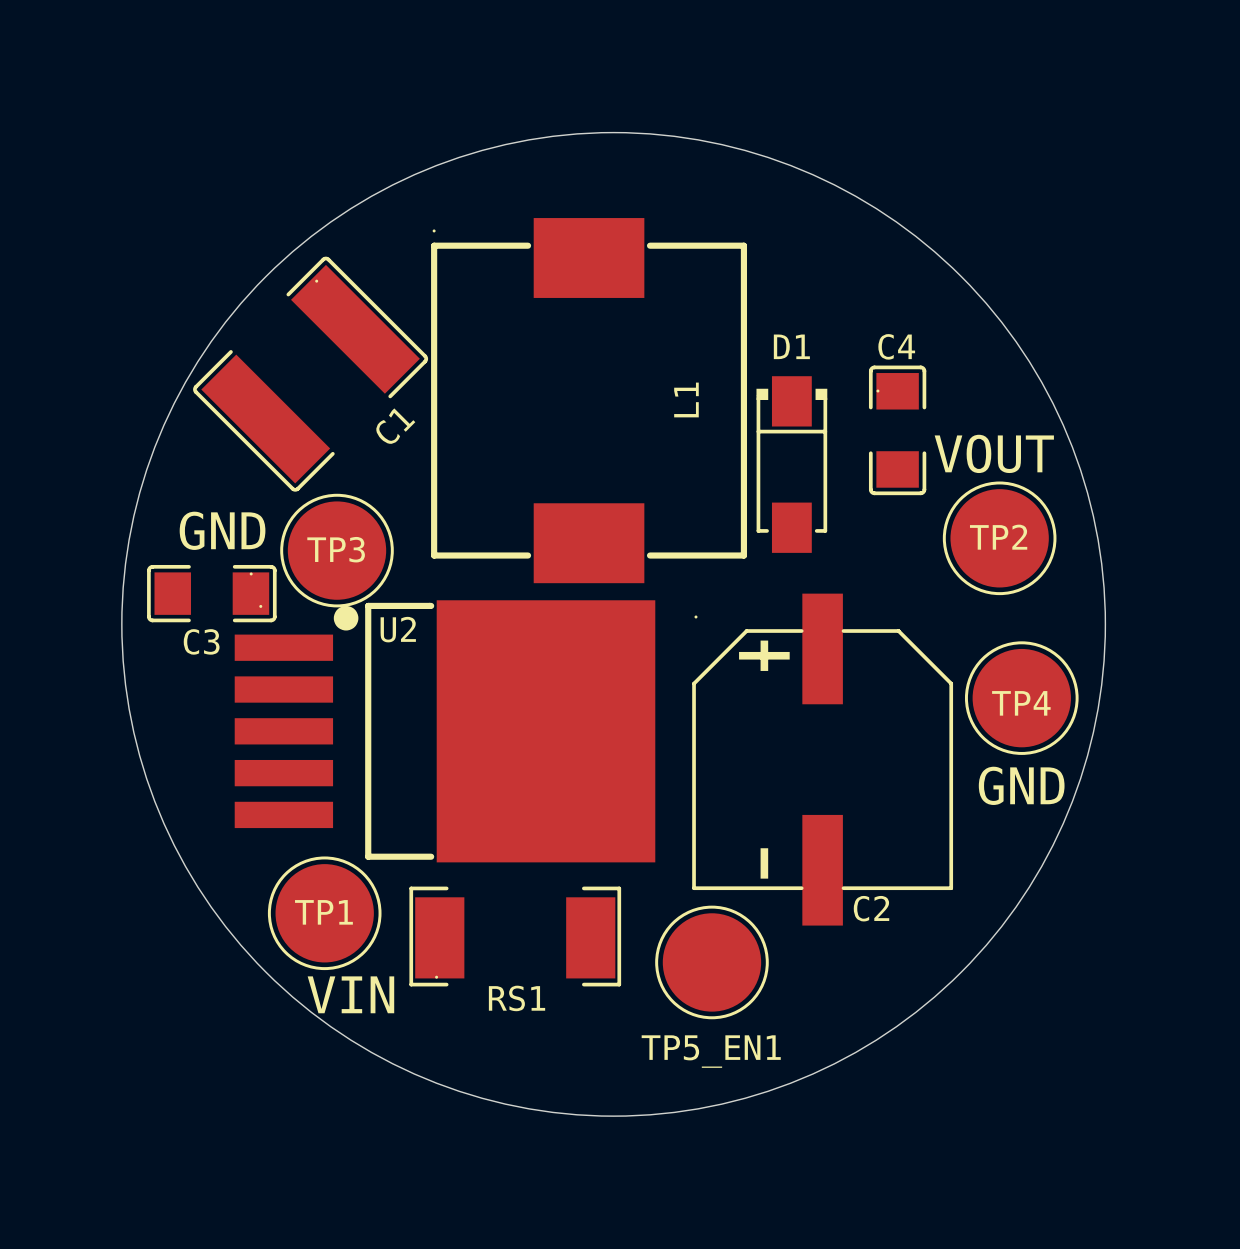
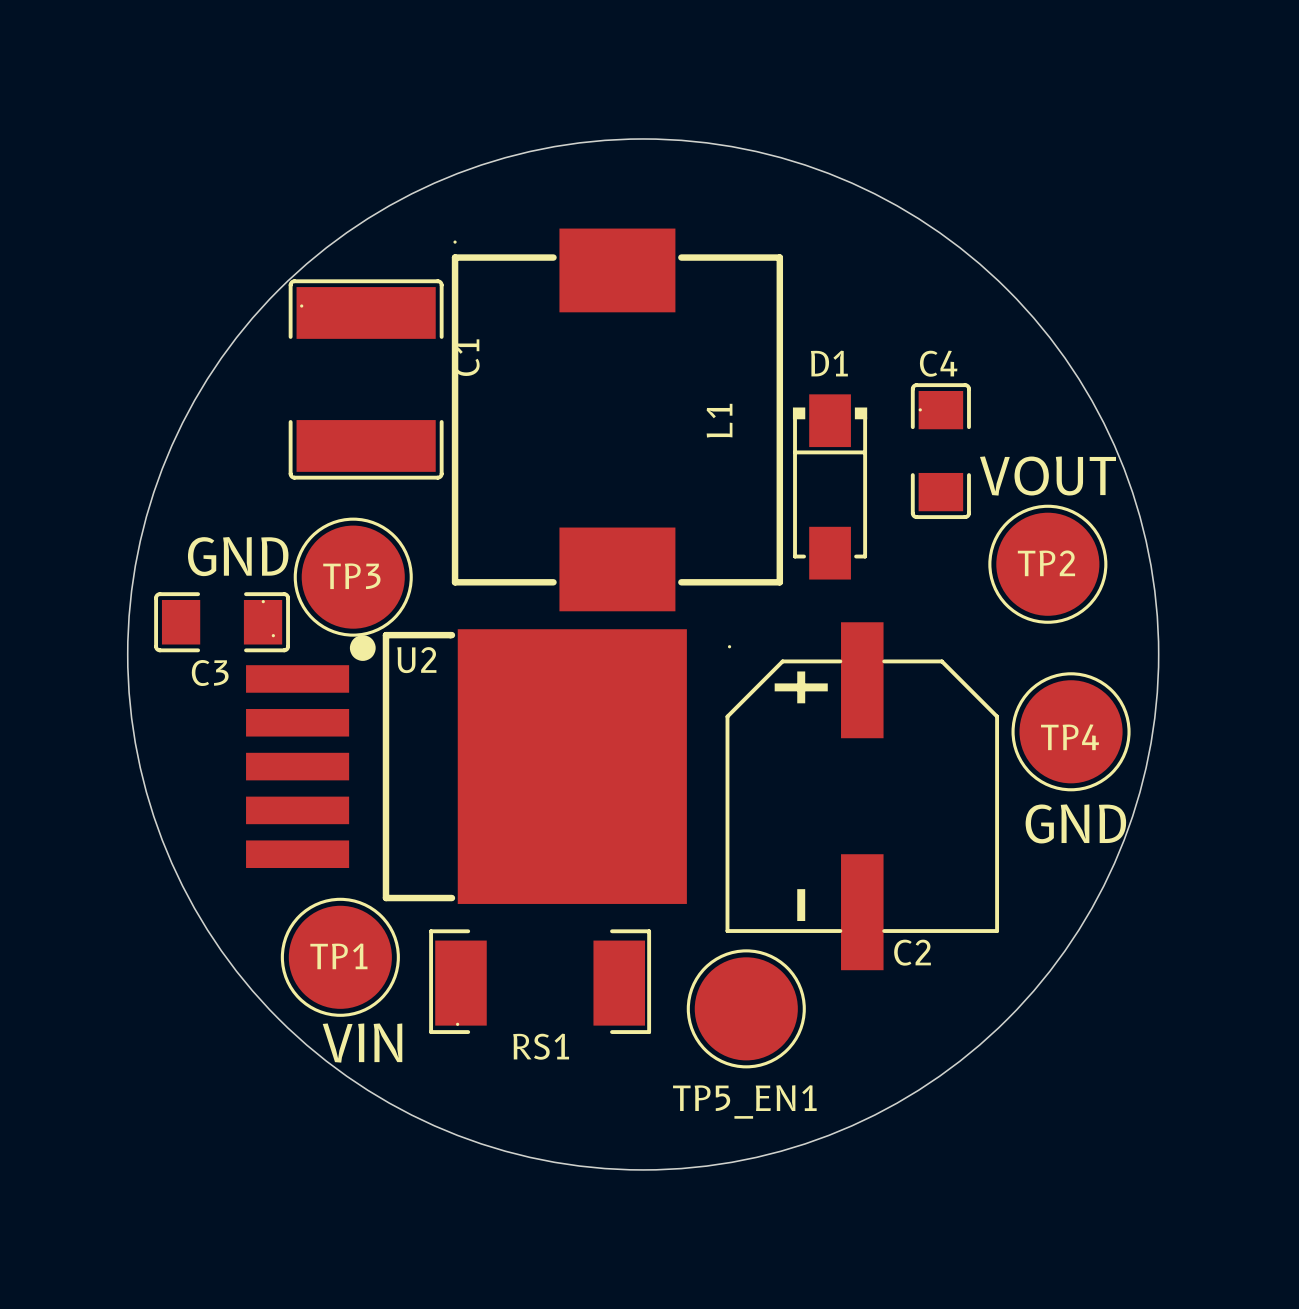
C1 rotation: 0° (310, 374) -> 45° counterclockwise (366, 379)

